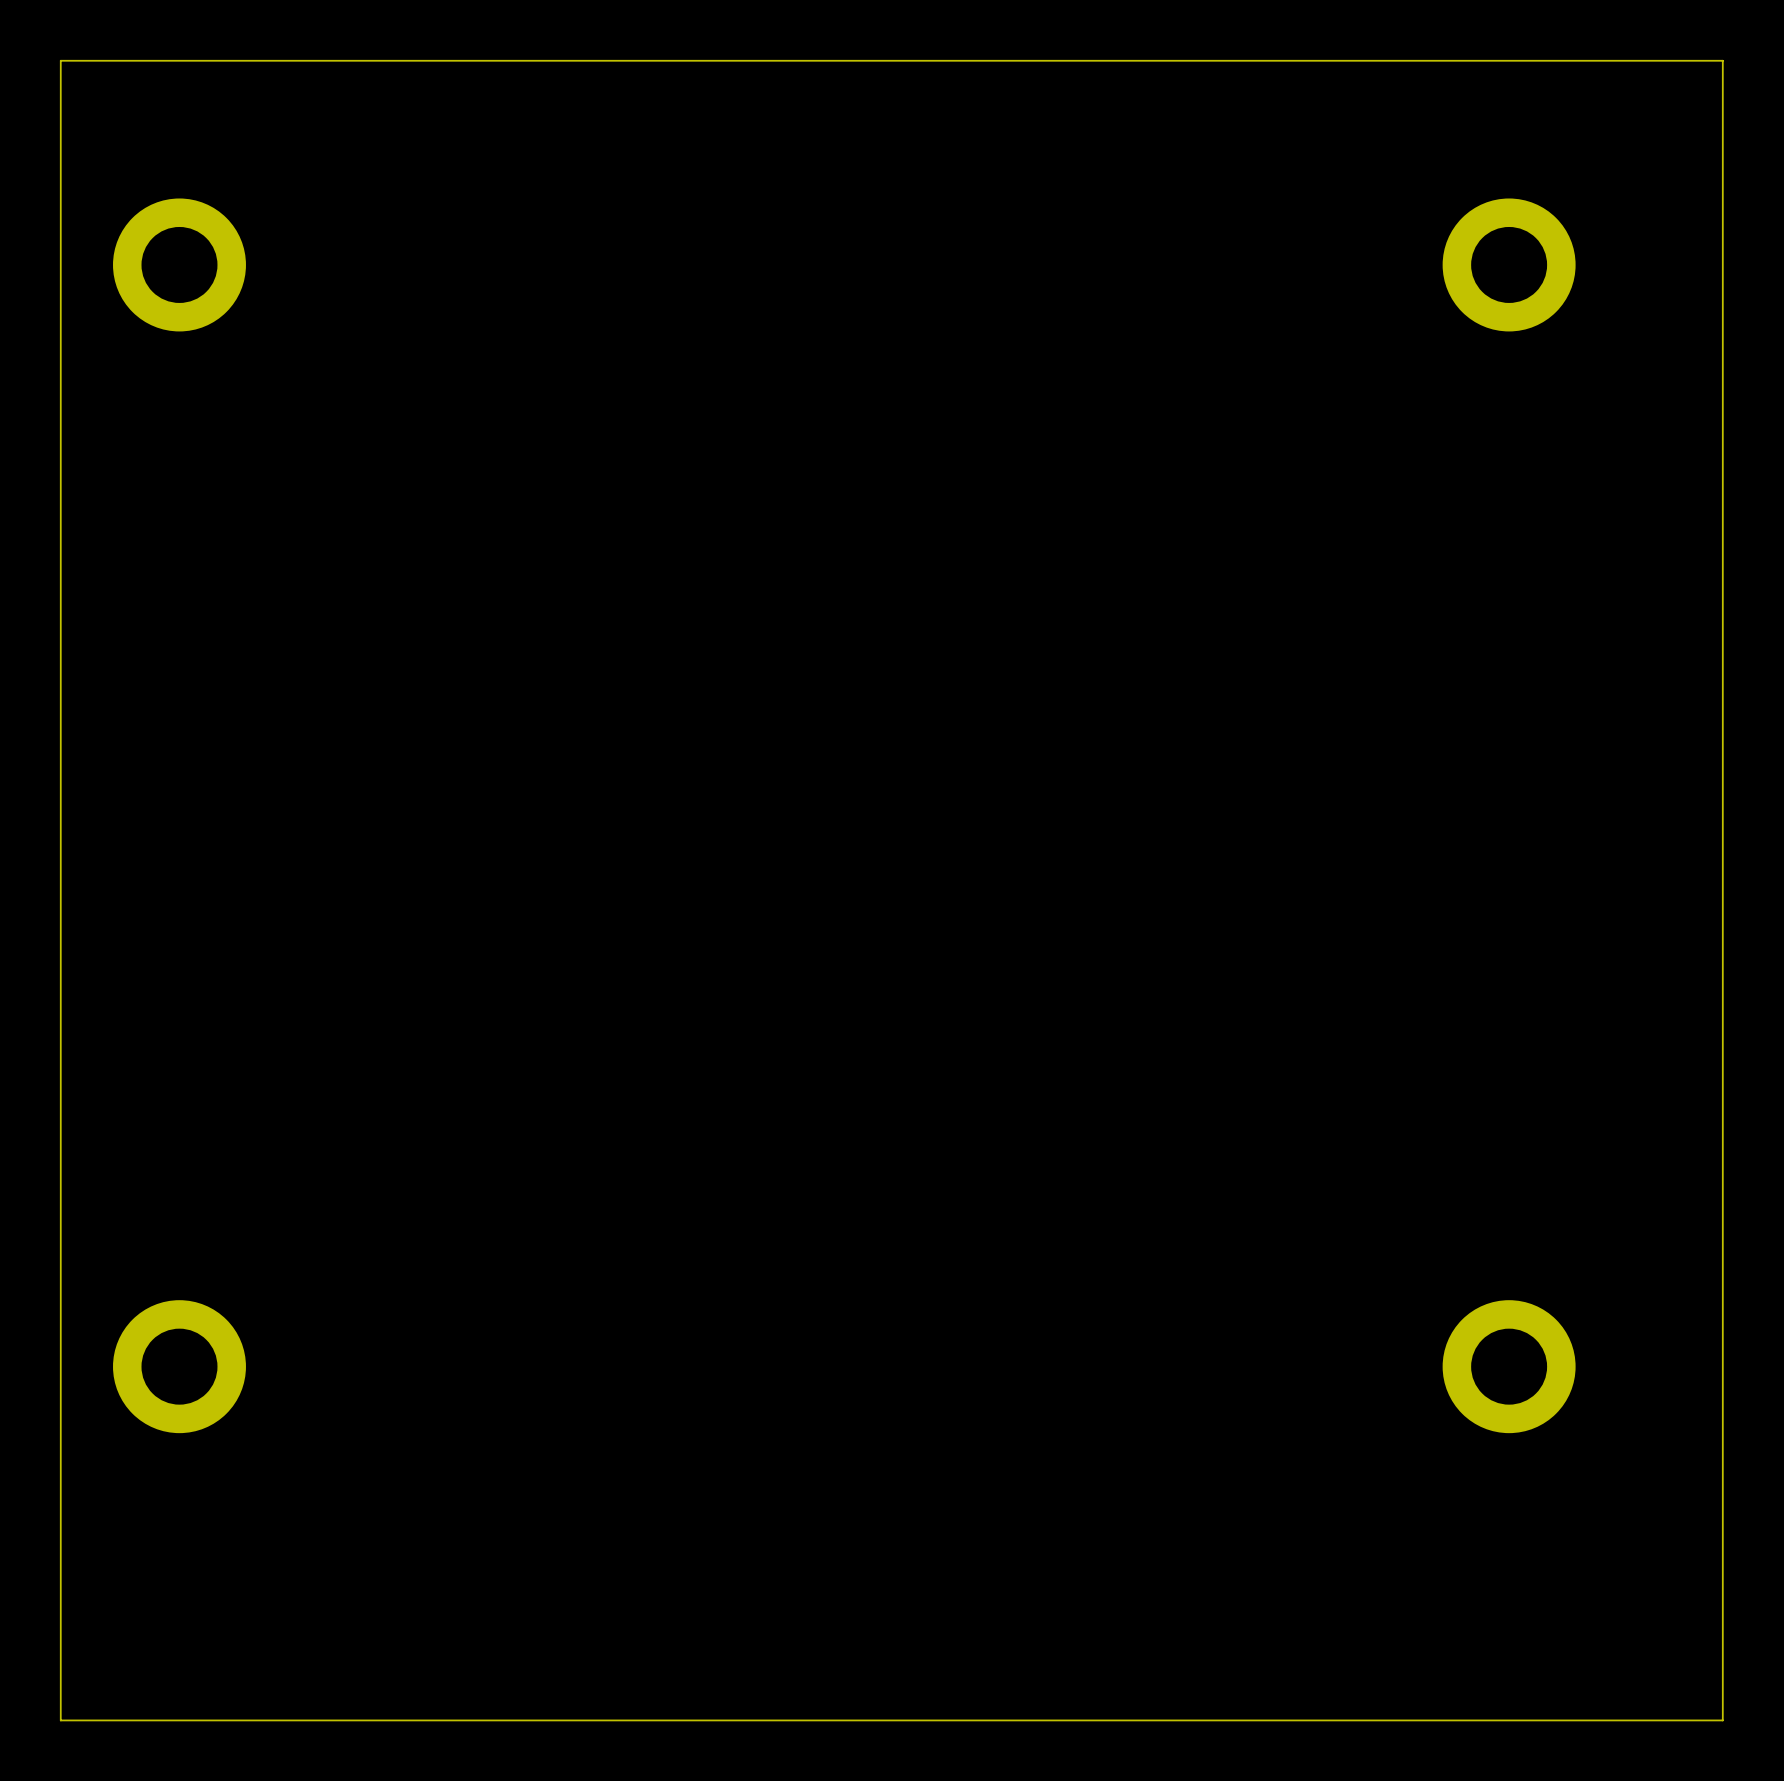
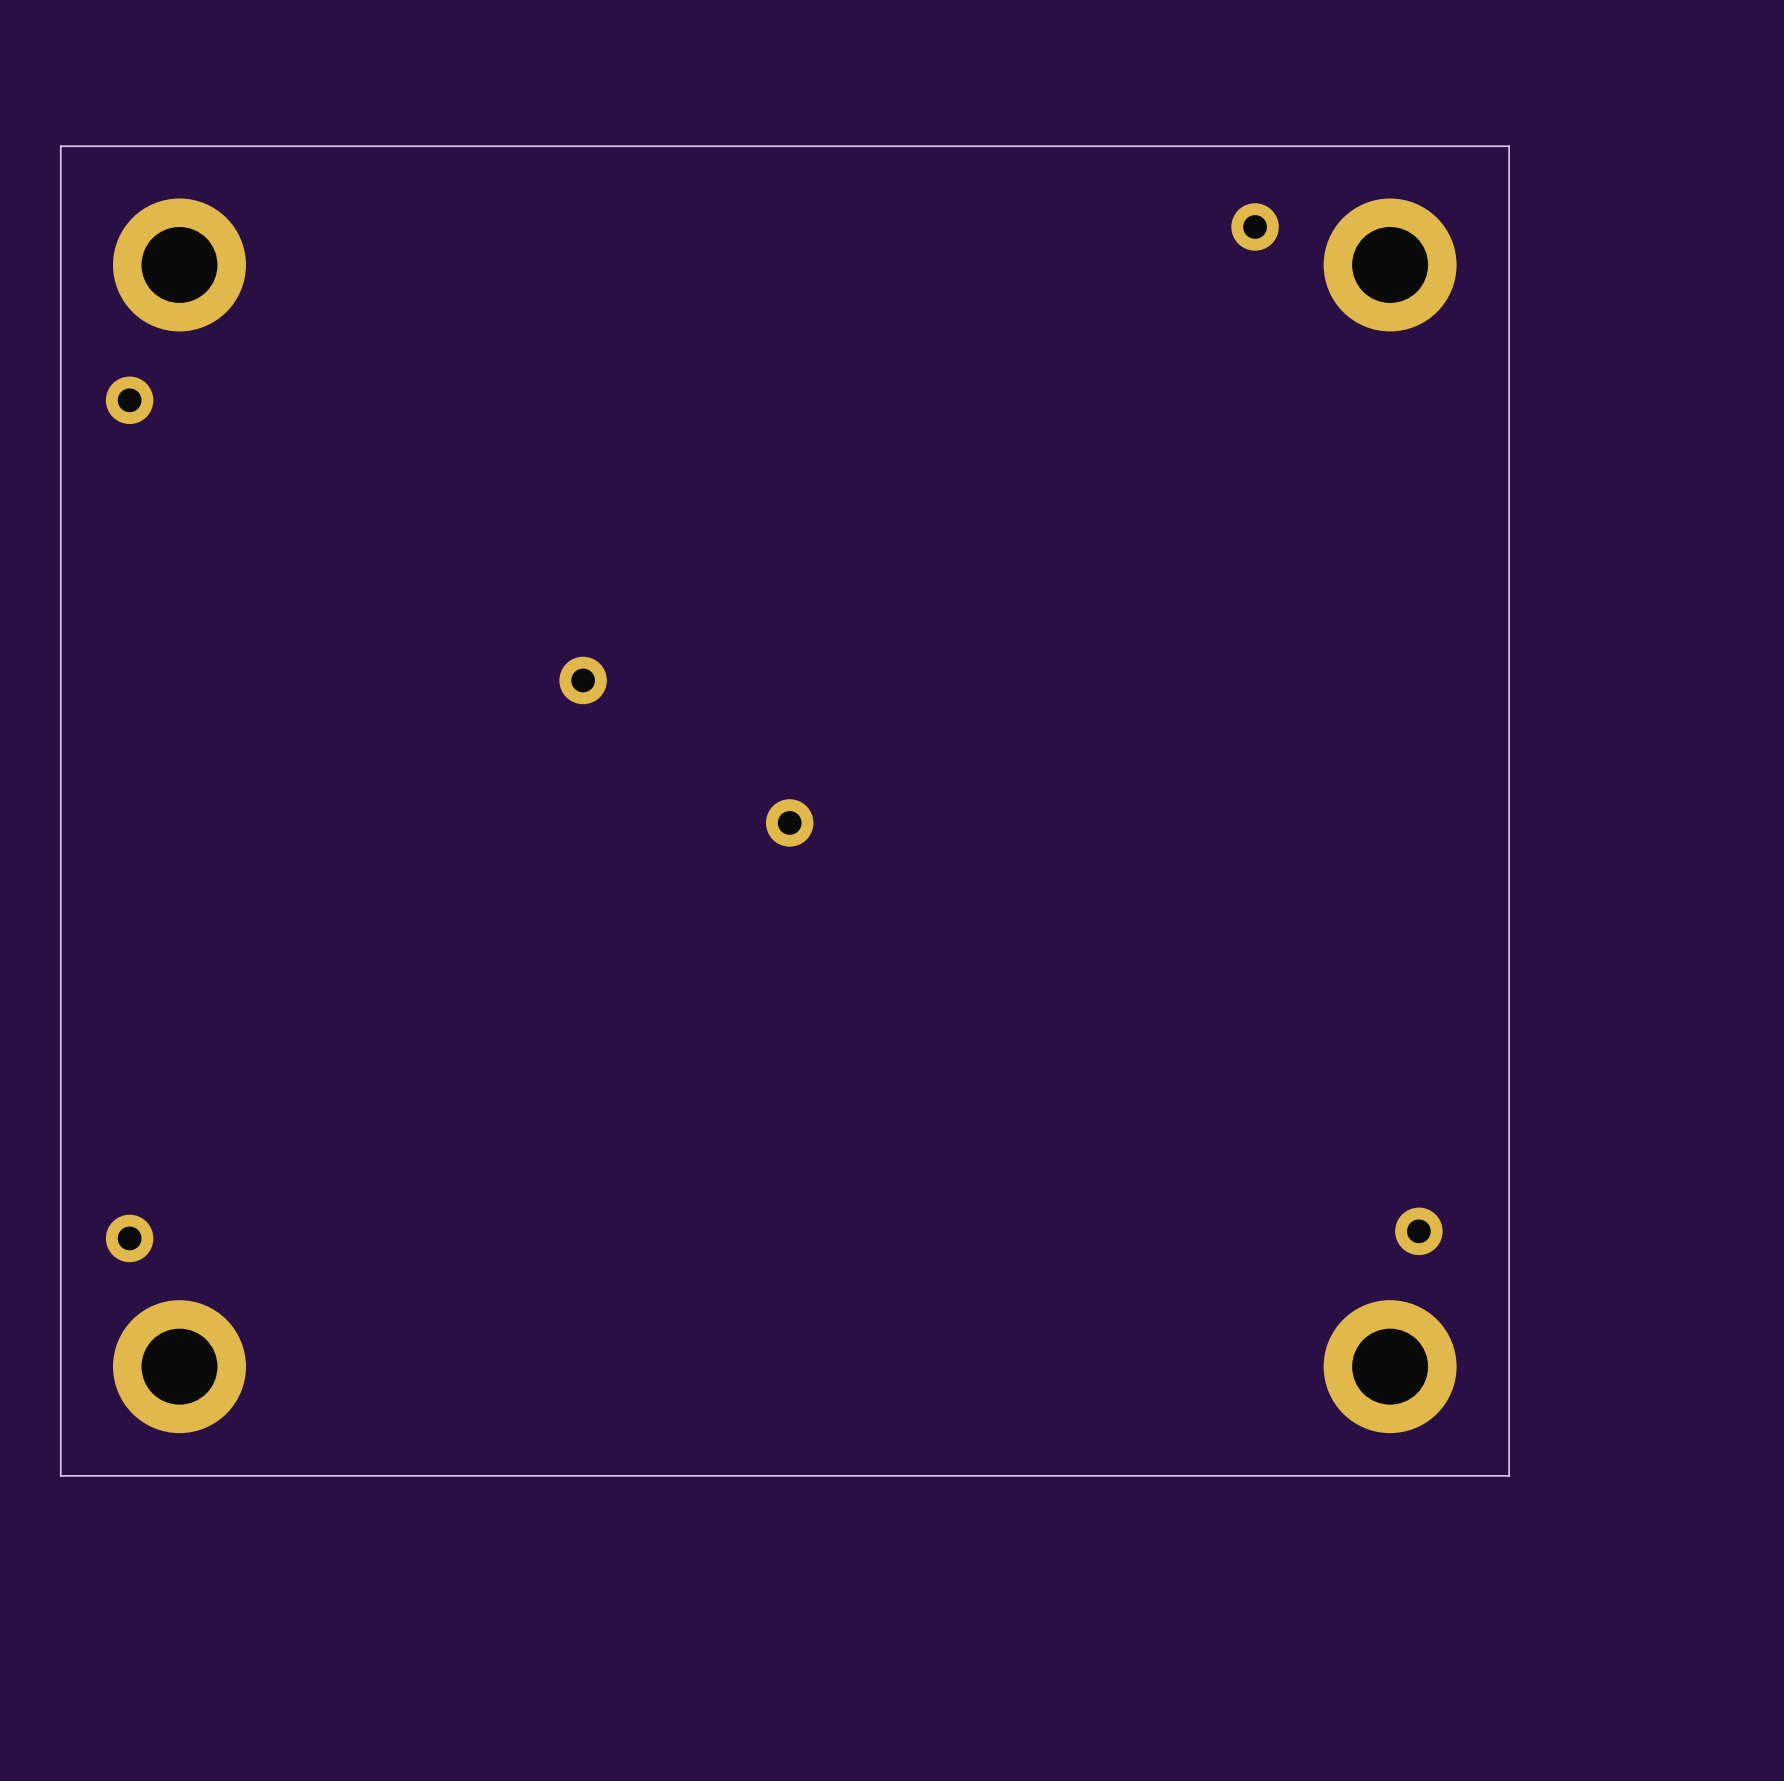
board edge: (60, 146) (60, 60) (1722, 60) (1722, 1720) (60, 1720) (60, 1475) -> (60, 146) (1509, 146) (1509, 1475) (60, 1475)
part: none -> (1255, 226)
part position: (1509, 264) -> (1390, 264)
part: none -> (129, 400)
part: none -> (583, 680)
part: none -> (789, 822)
part: none -> (1418, 1231)
part: none -> (129, 1238)
part position: (1509, 1366) -> (1390, 1366)

